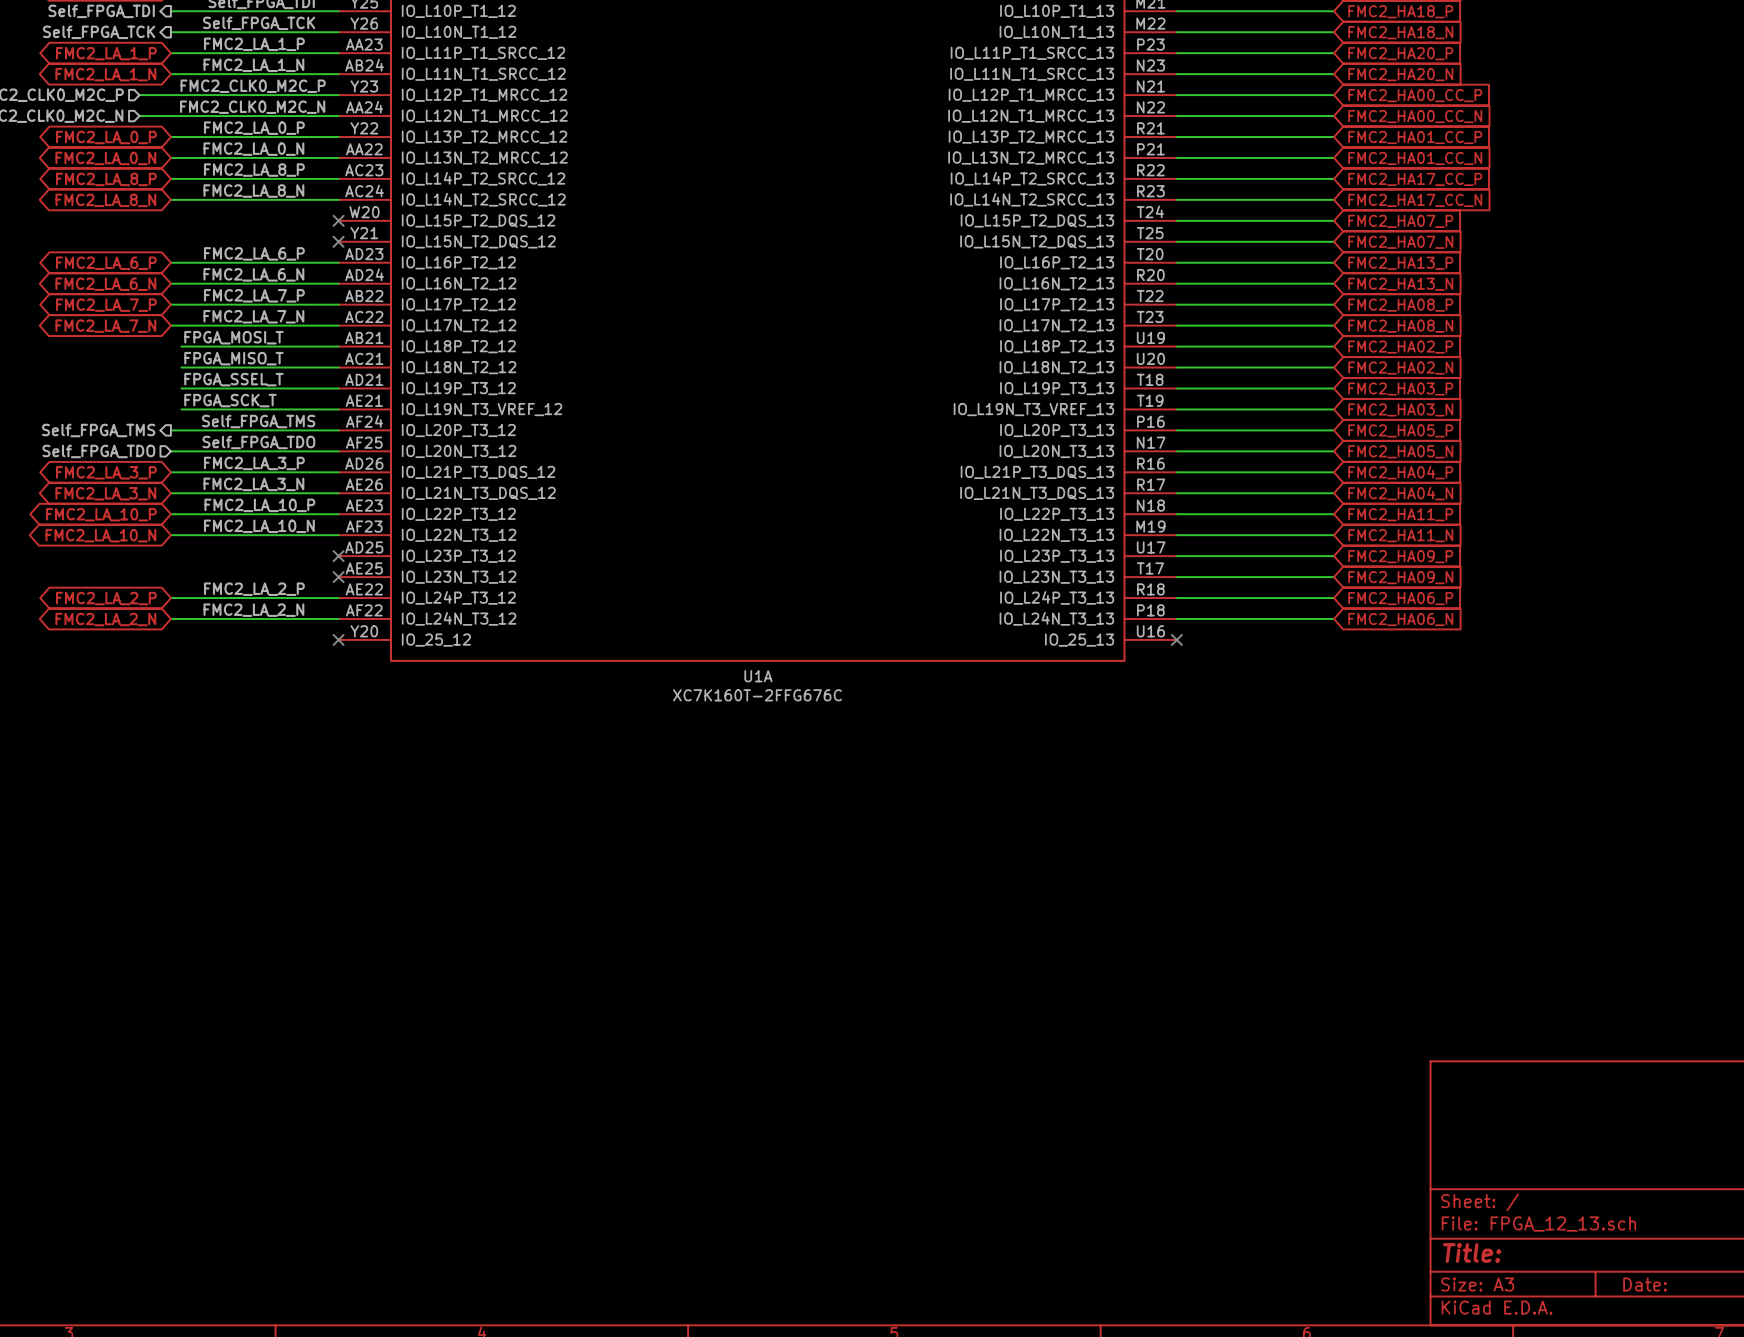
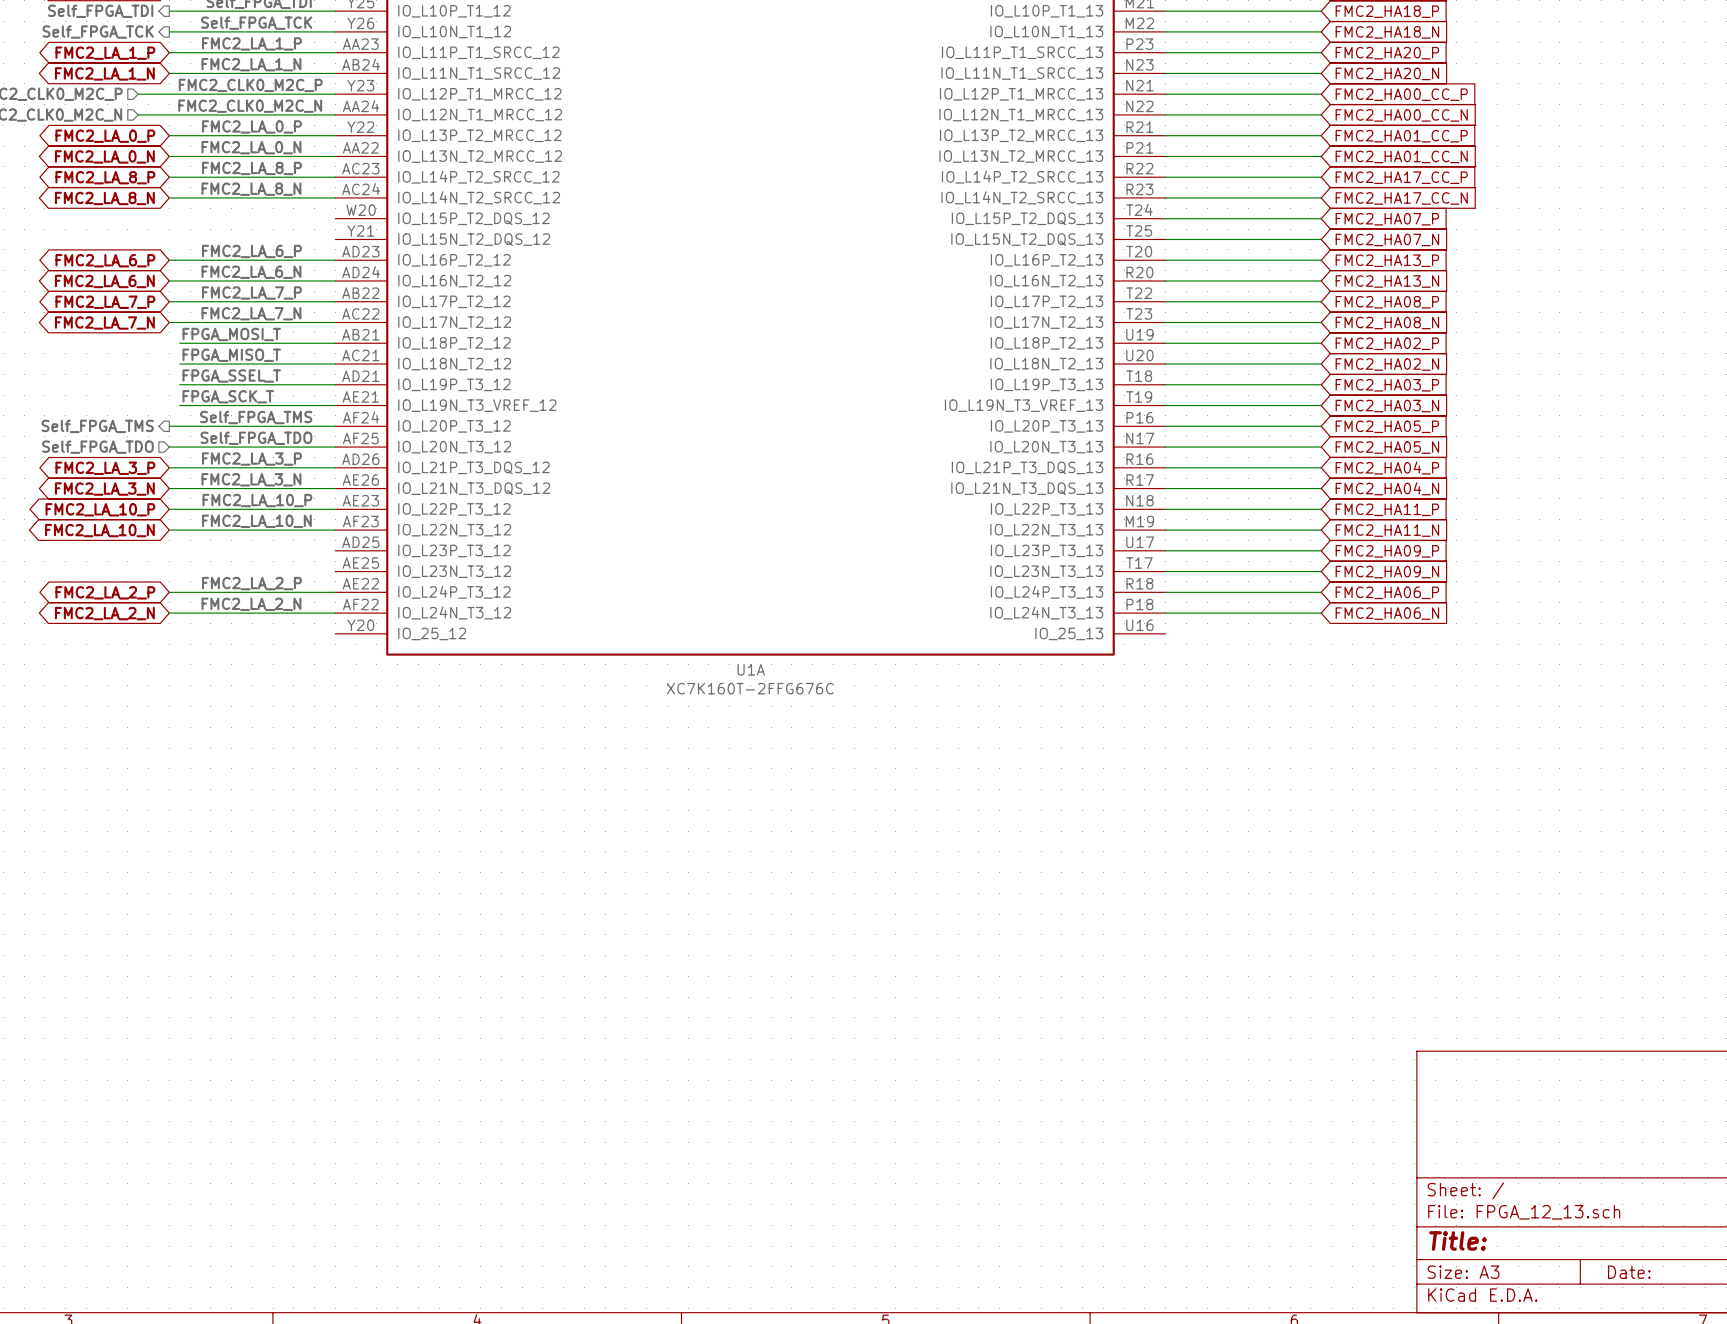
no-connect mark: (338, 220) -> none
no-connect mark: (338, 241) -> none
no-connect mark: (338, 556) -> none
no-connect mark: (338, 577) -> none
no-connect mark: (338, 639) -> none
no-connect mark: (1176, 639) -> none

